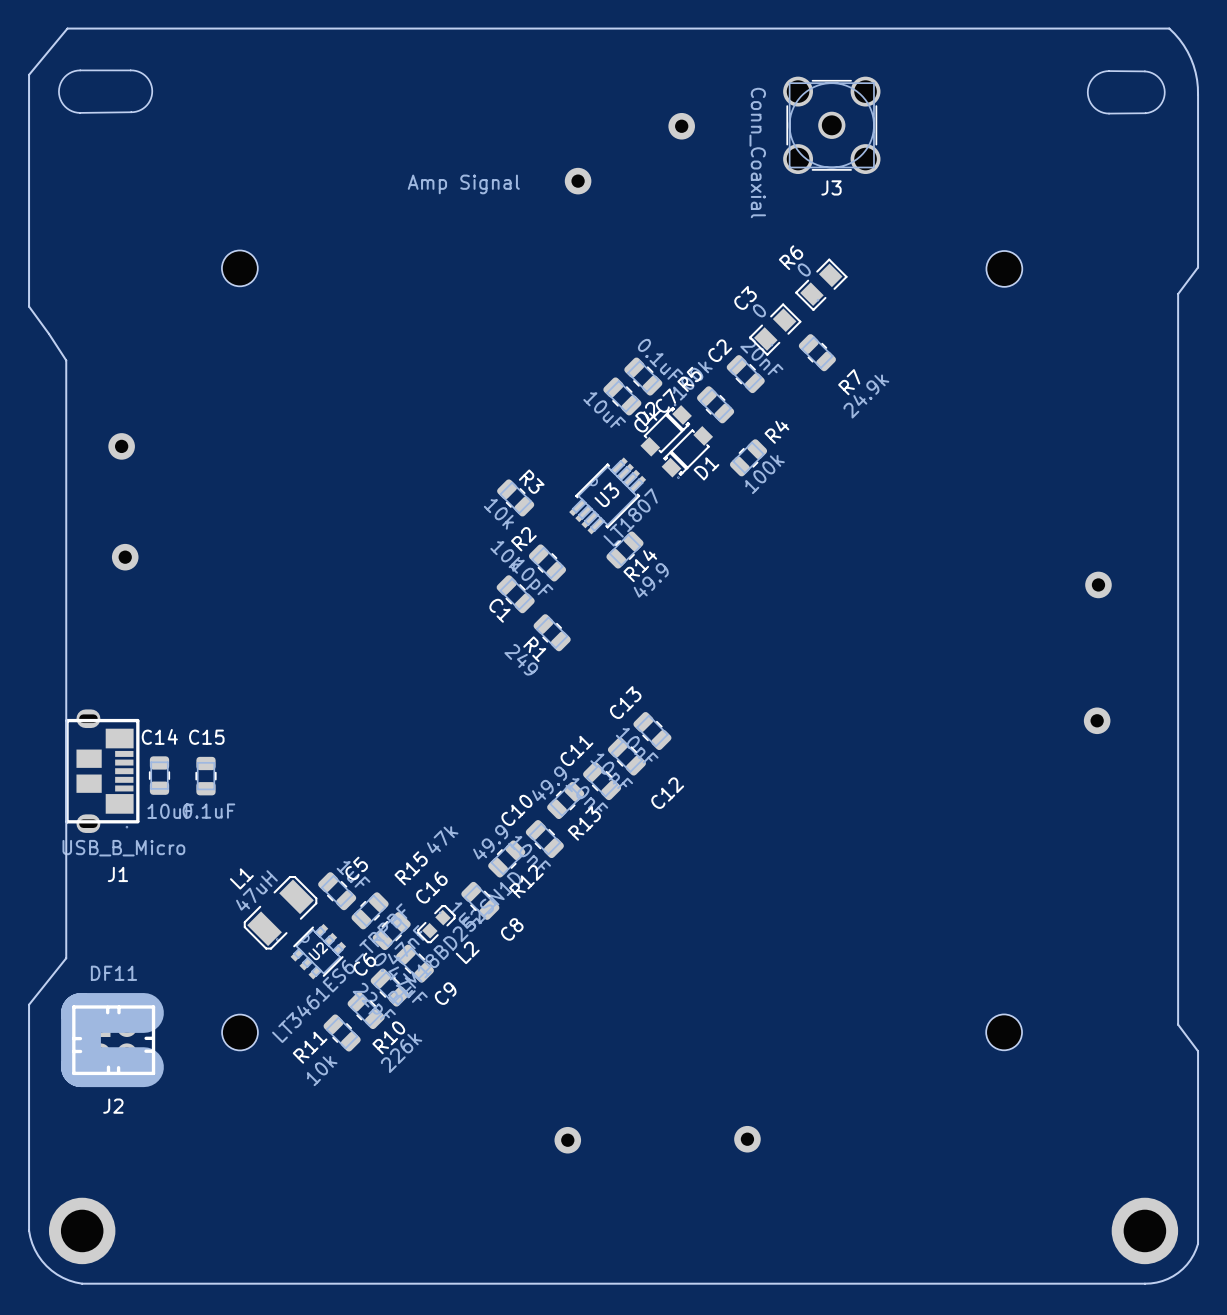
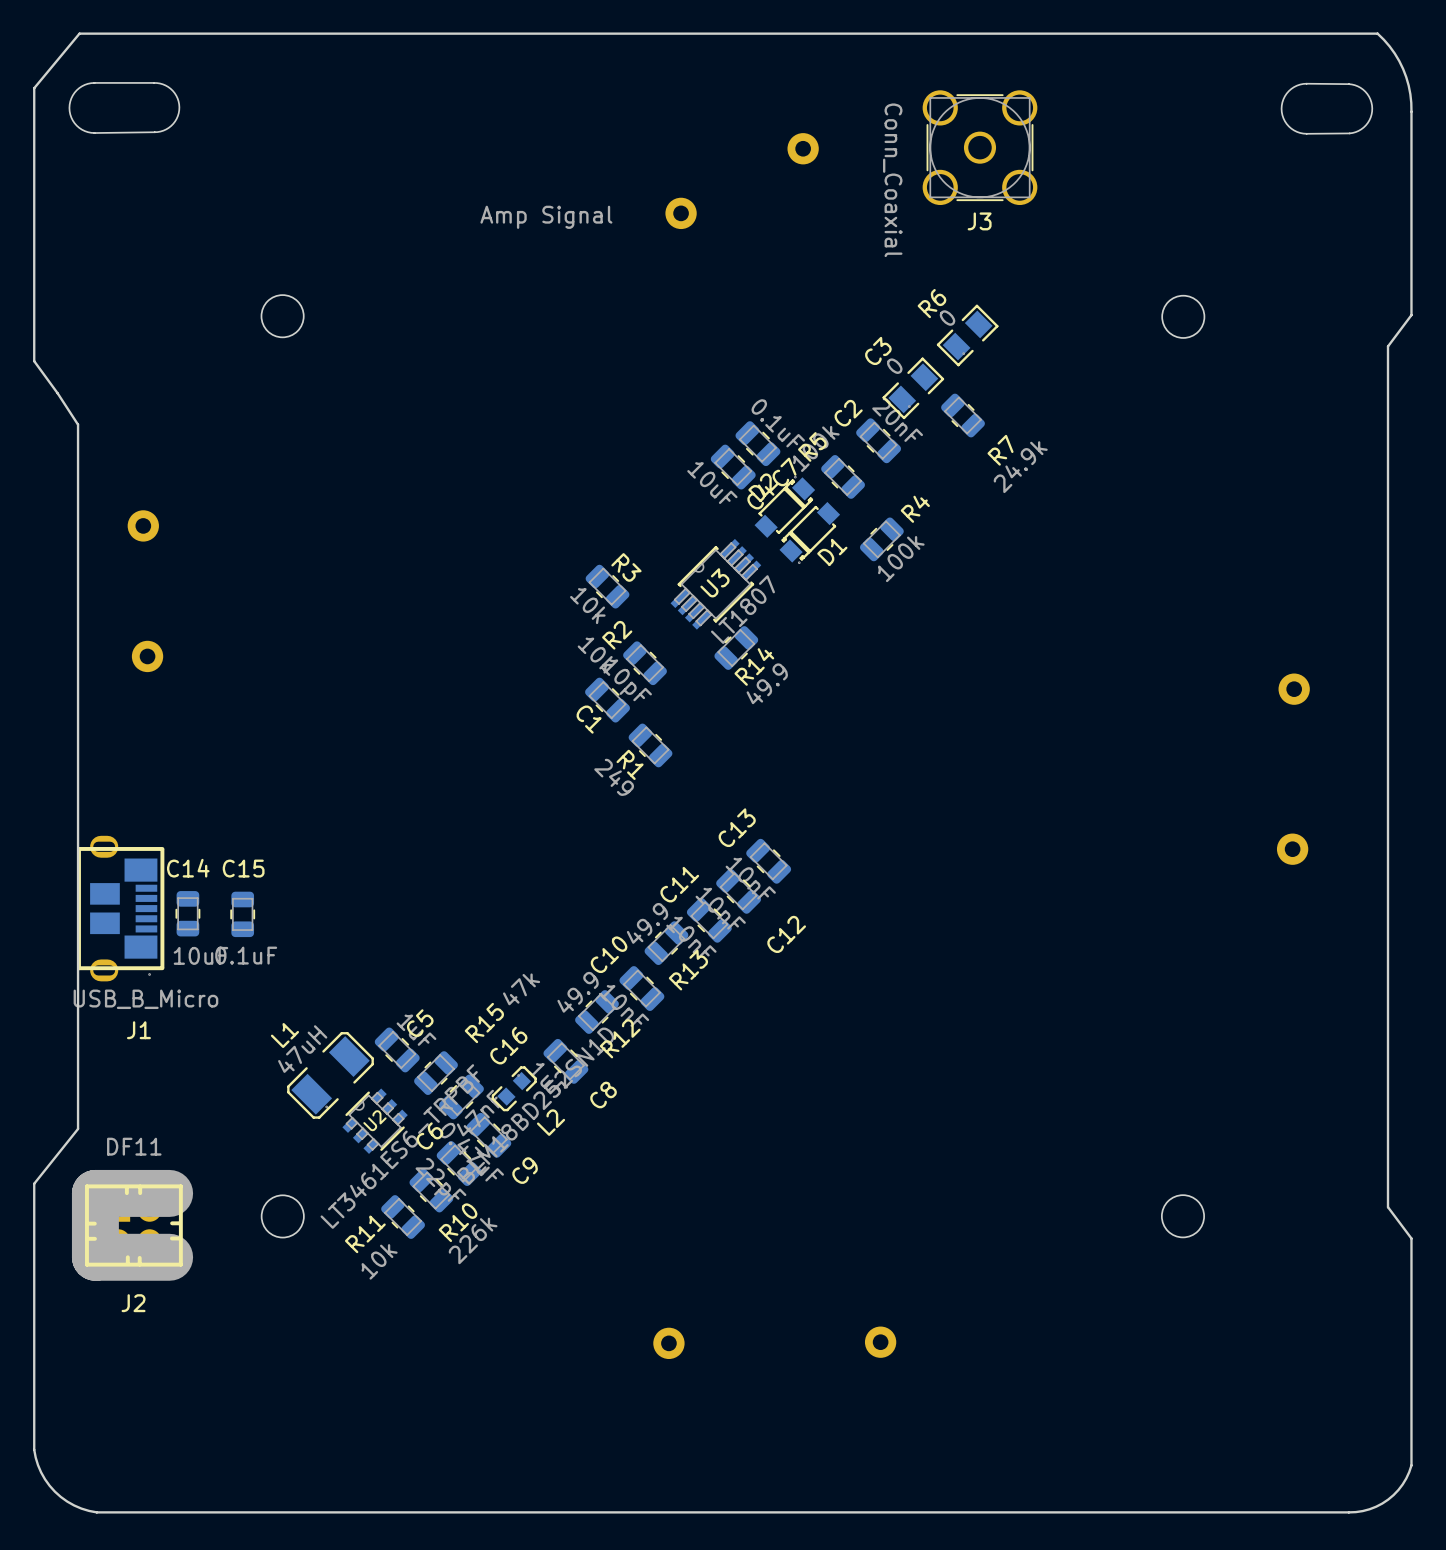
part: (82, 1230) -> none
part: (1144, 1230) -> none

